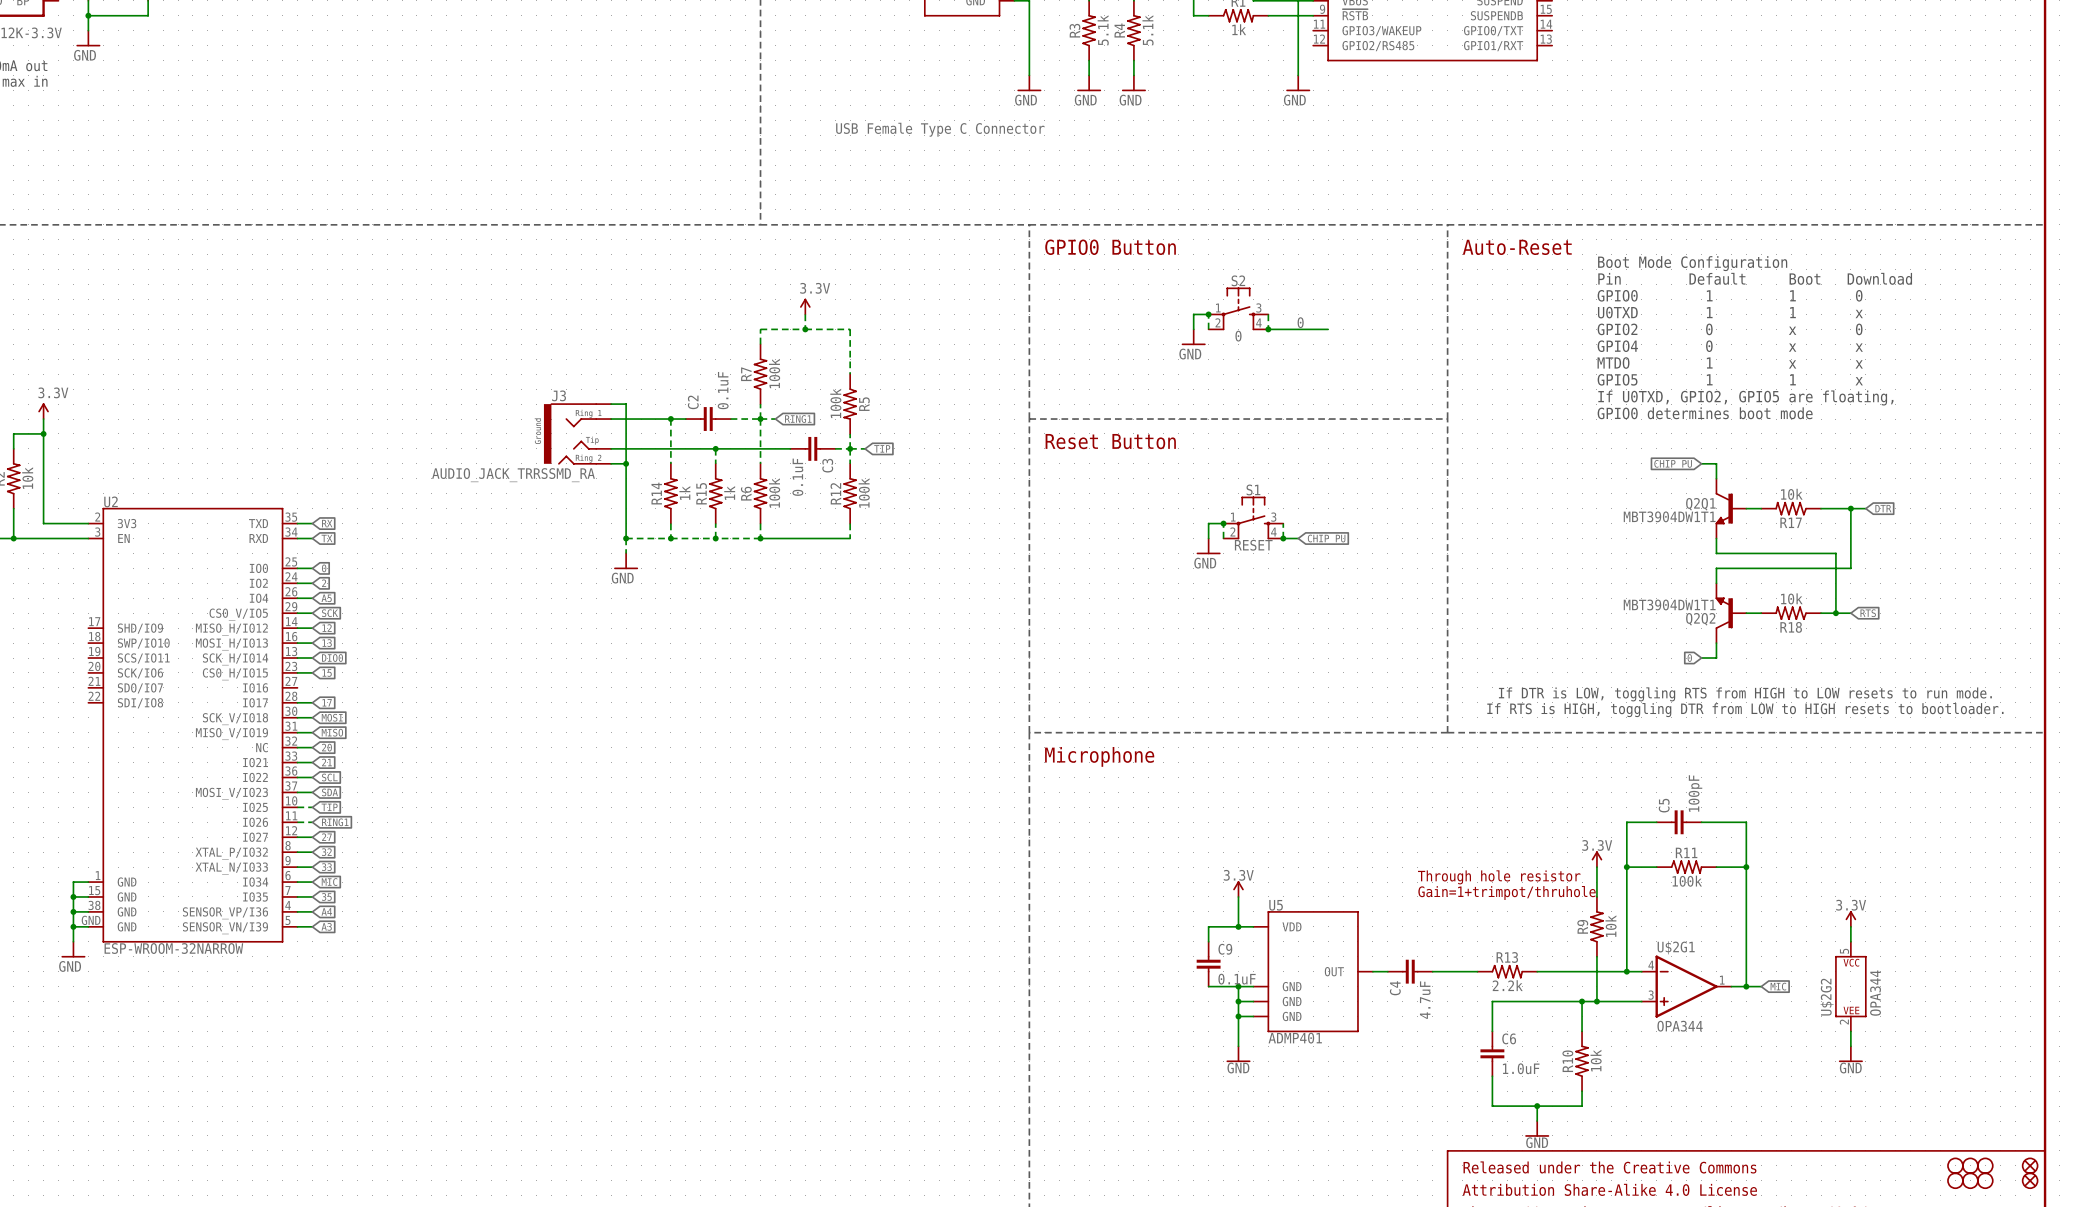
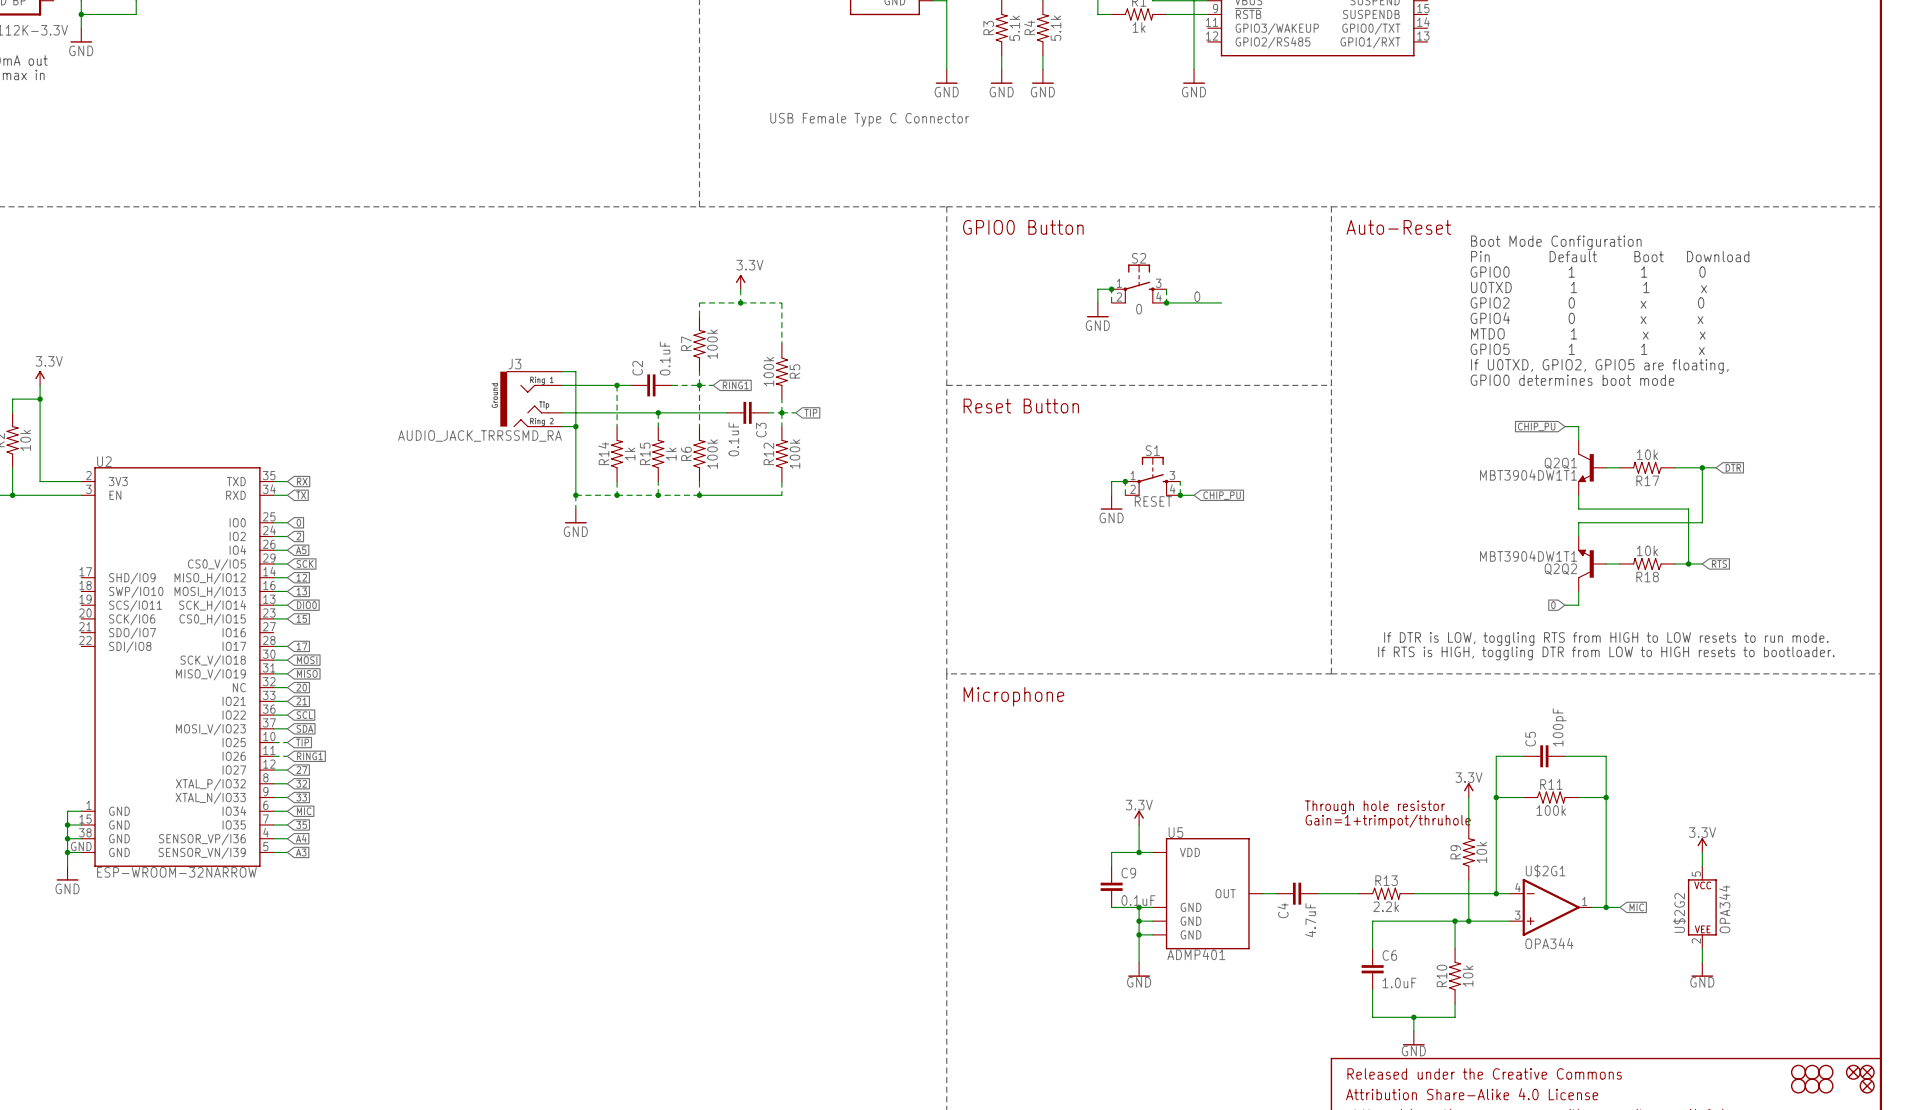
part: none -> (1853, 1072)

